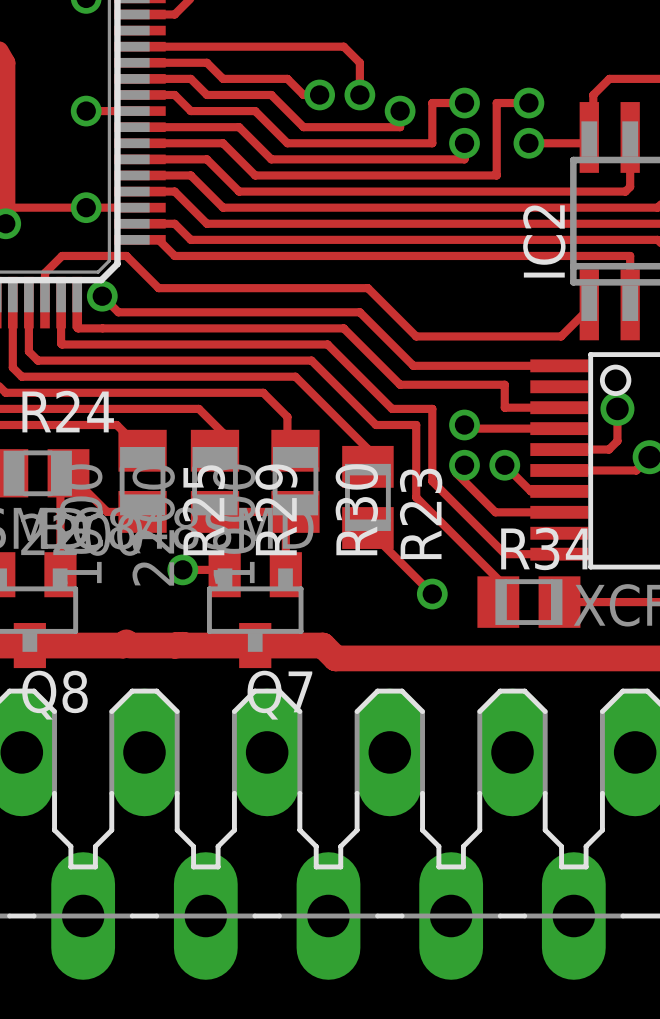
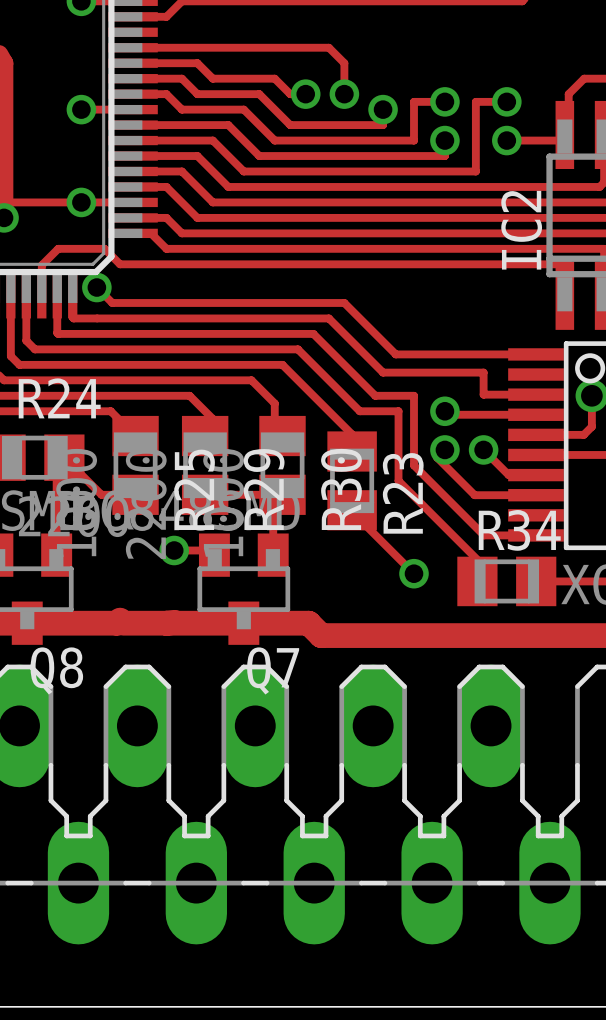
track: (110, 255) (126, 255) (158, 288) (367, 288) (416, 336) (561, 336) (592, 304) -> (104, 248) (120, 264) (568, 264) (568, 295)

